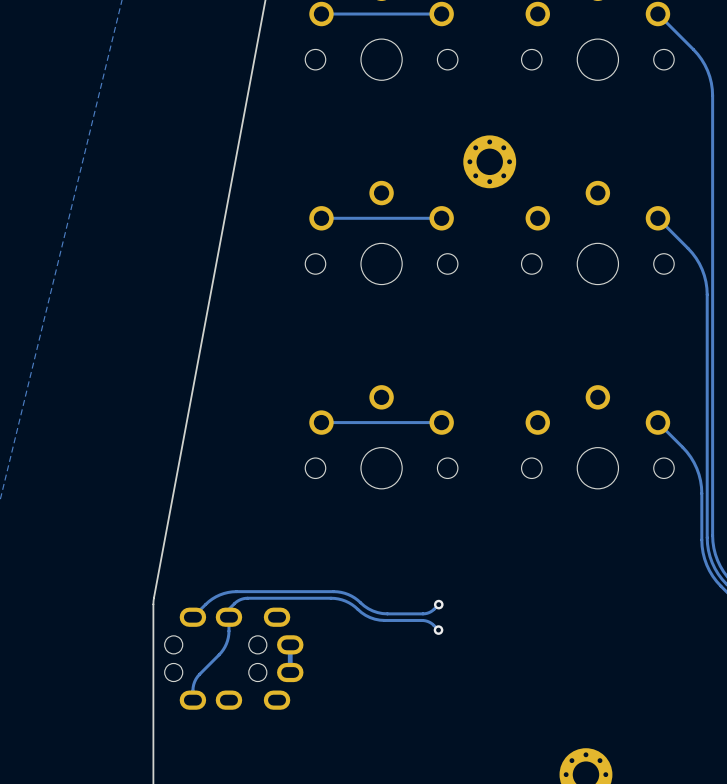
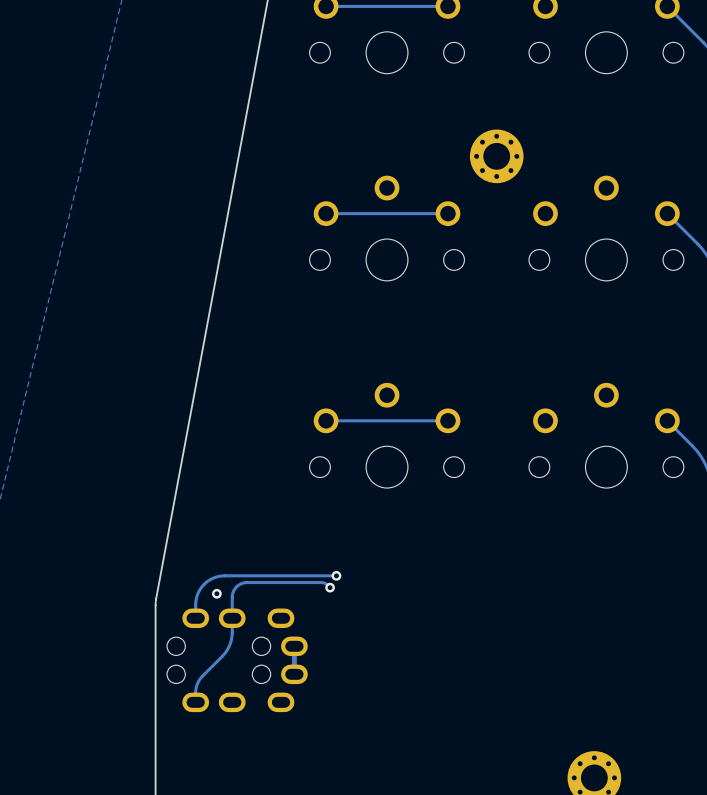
via: none -> (336, 575)
track: none -> (330, 587) (322, 582) (242, 583) (236, 586) (232, 593) (232, 618)
via: none -> (330, 587)
via: none -> (216, 593)
track: (438, 604) (430, 611) (425, 613) (387, 613) (372, 610) (351, 596) (337, 591) (232, 591) (212, 599) (192, 617) -> (336, 575) (216, 577) (206, 582) (199, 590) (195, 601) (195, 618)
via: (438, 604) -> none
track: (228, 609) (237, 601) (245, 598) (334, 598) (348, 602) (365, 615) (374, 619) (425, 620) (438, 630) -> none
via: (438, 630) -> none

